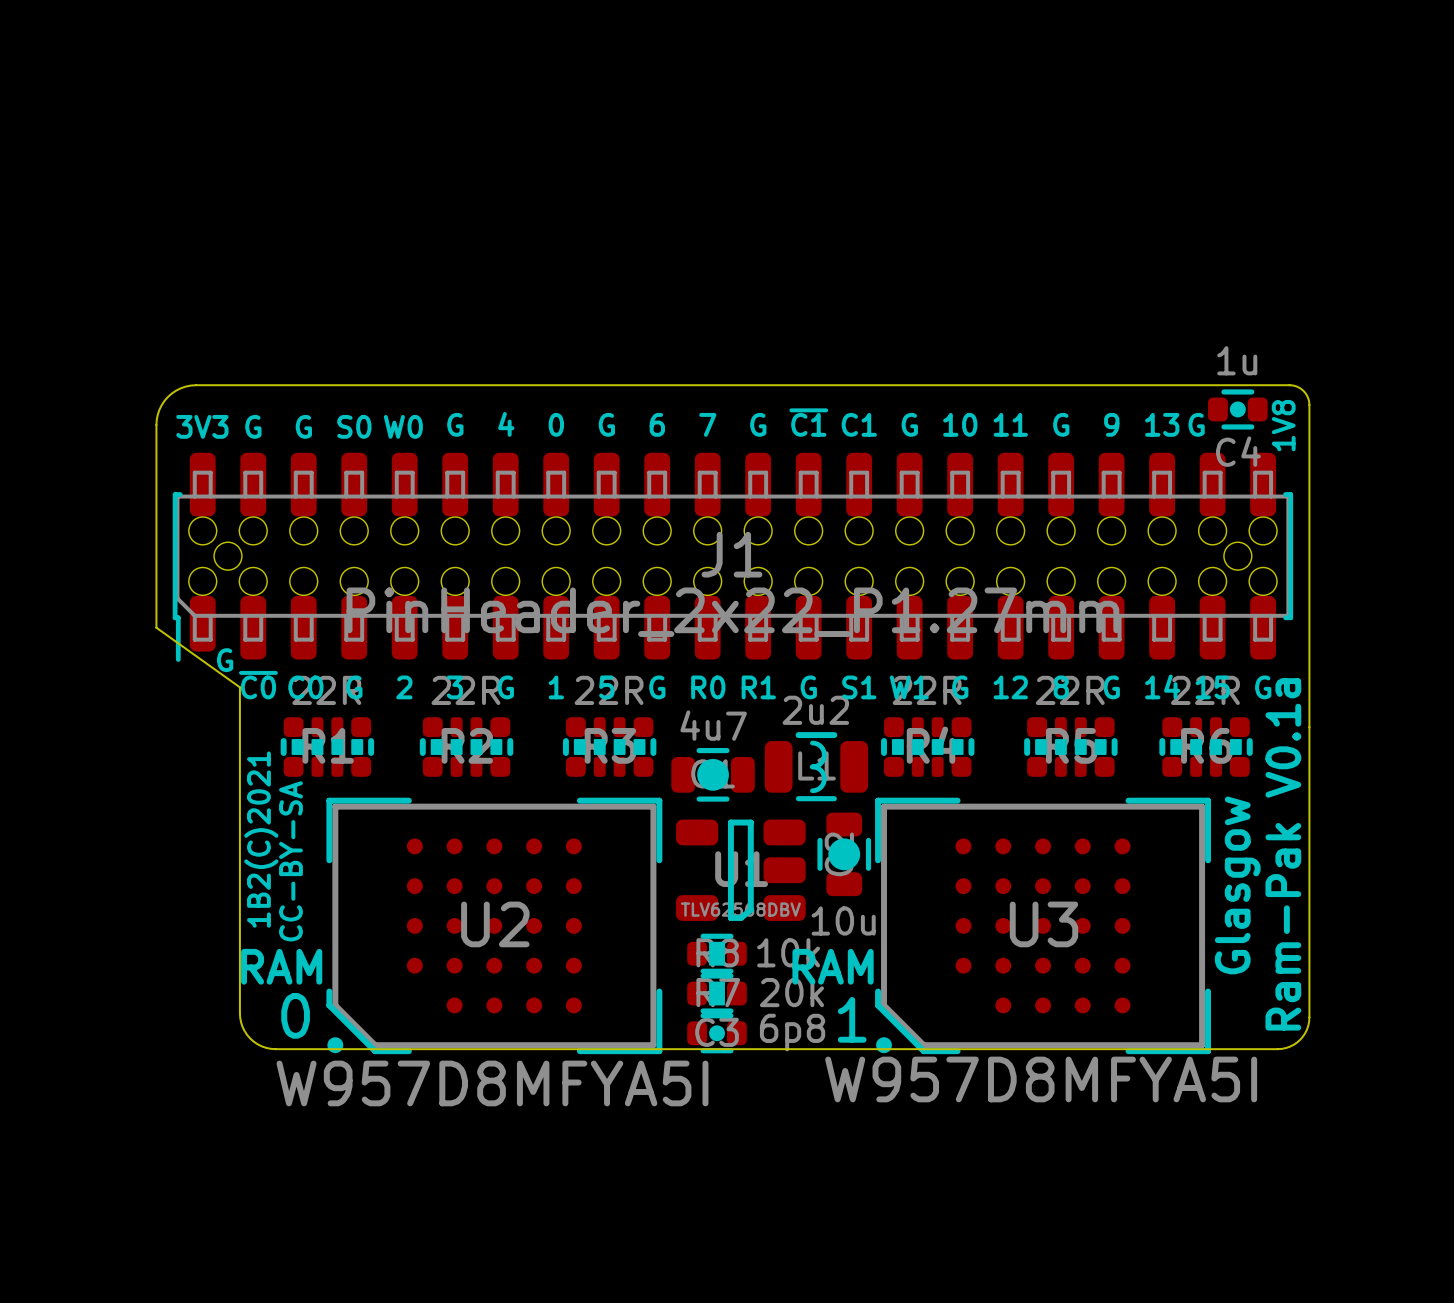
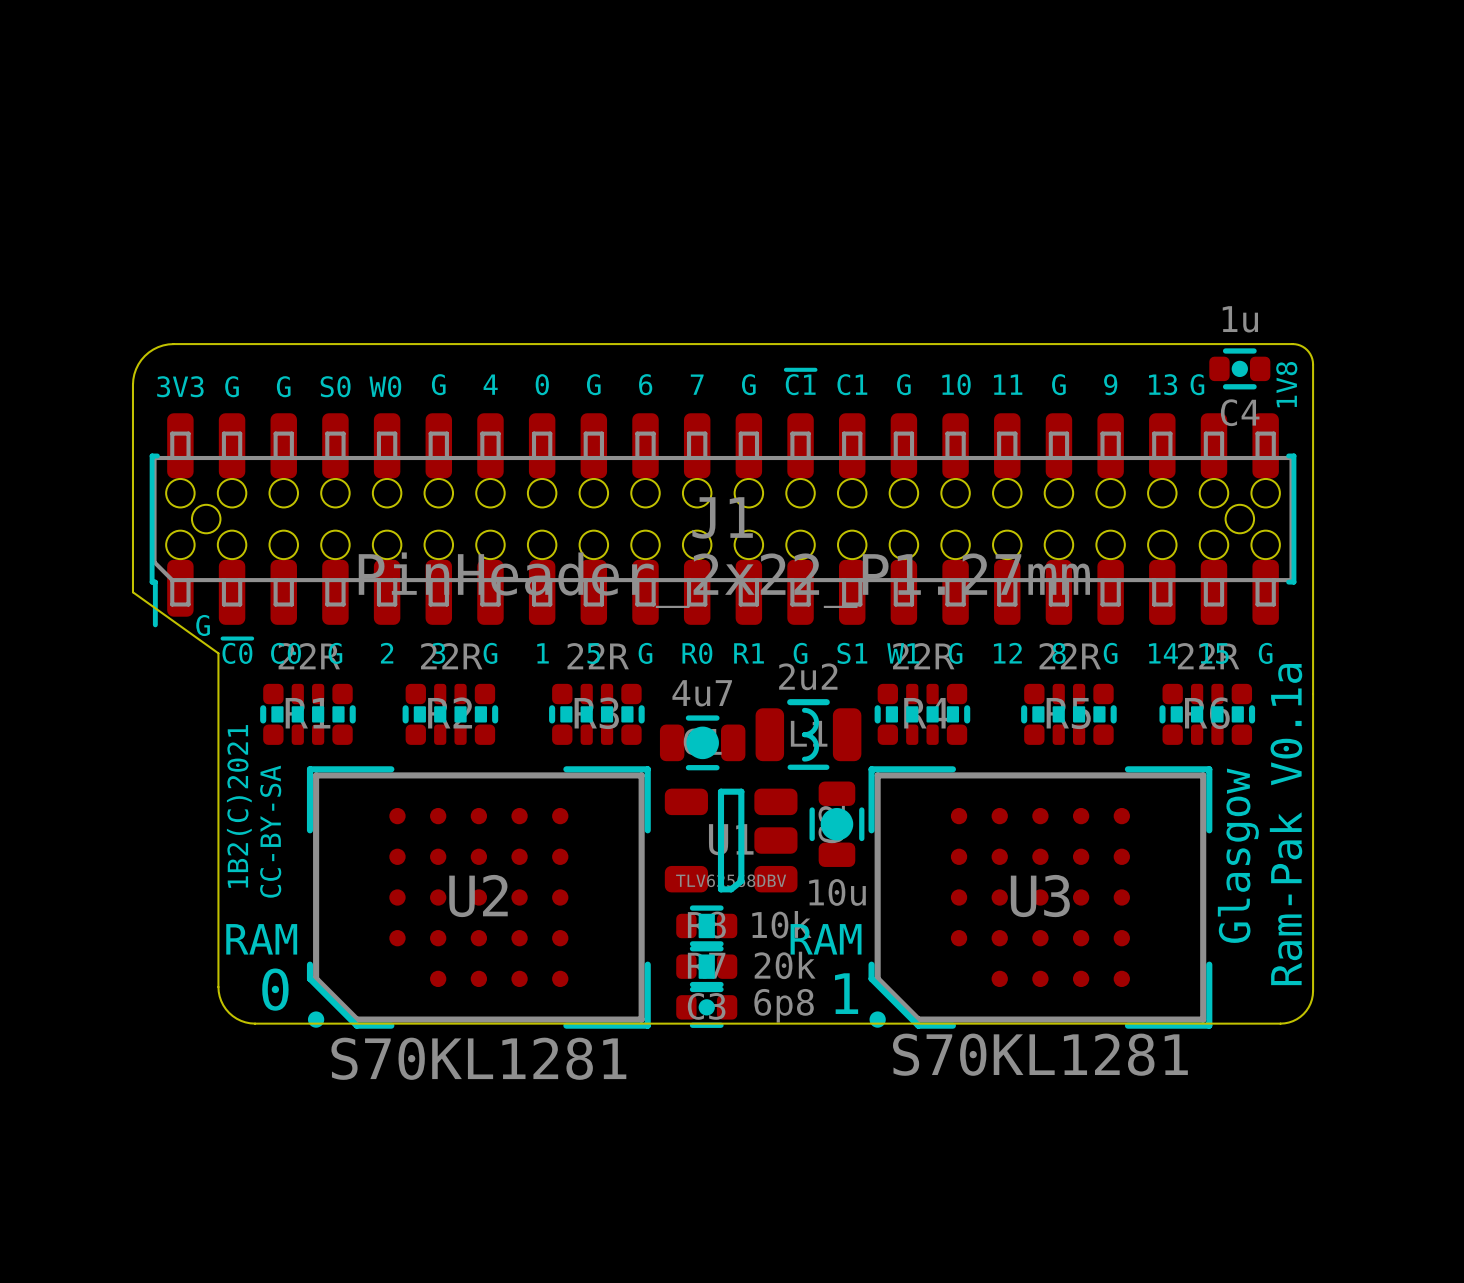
U3 value: W957D8MFYA5I (1041, 1079) -> S70KL1281 (1040, 1054)
U2 value: W957D8MFYA5I (492, 1083) -> S70KL1281 (478, 1058)

